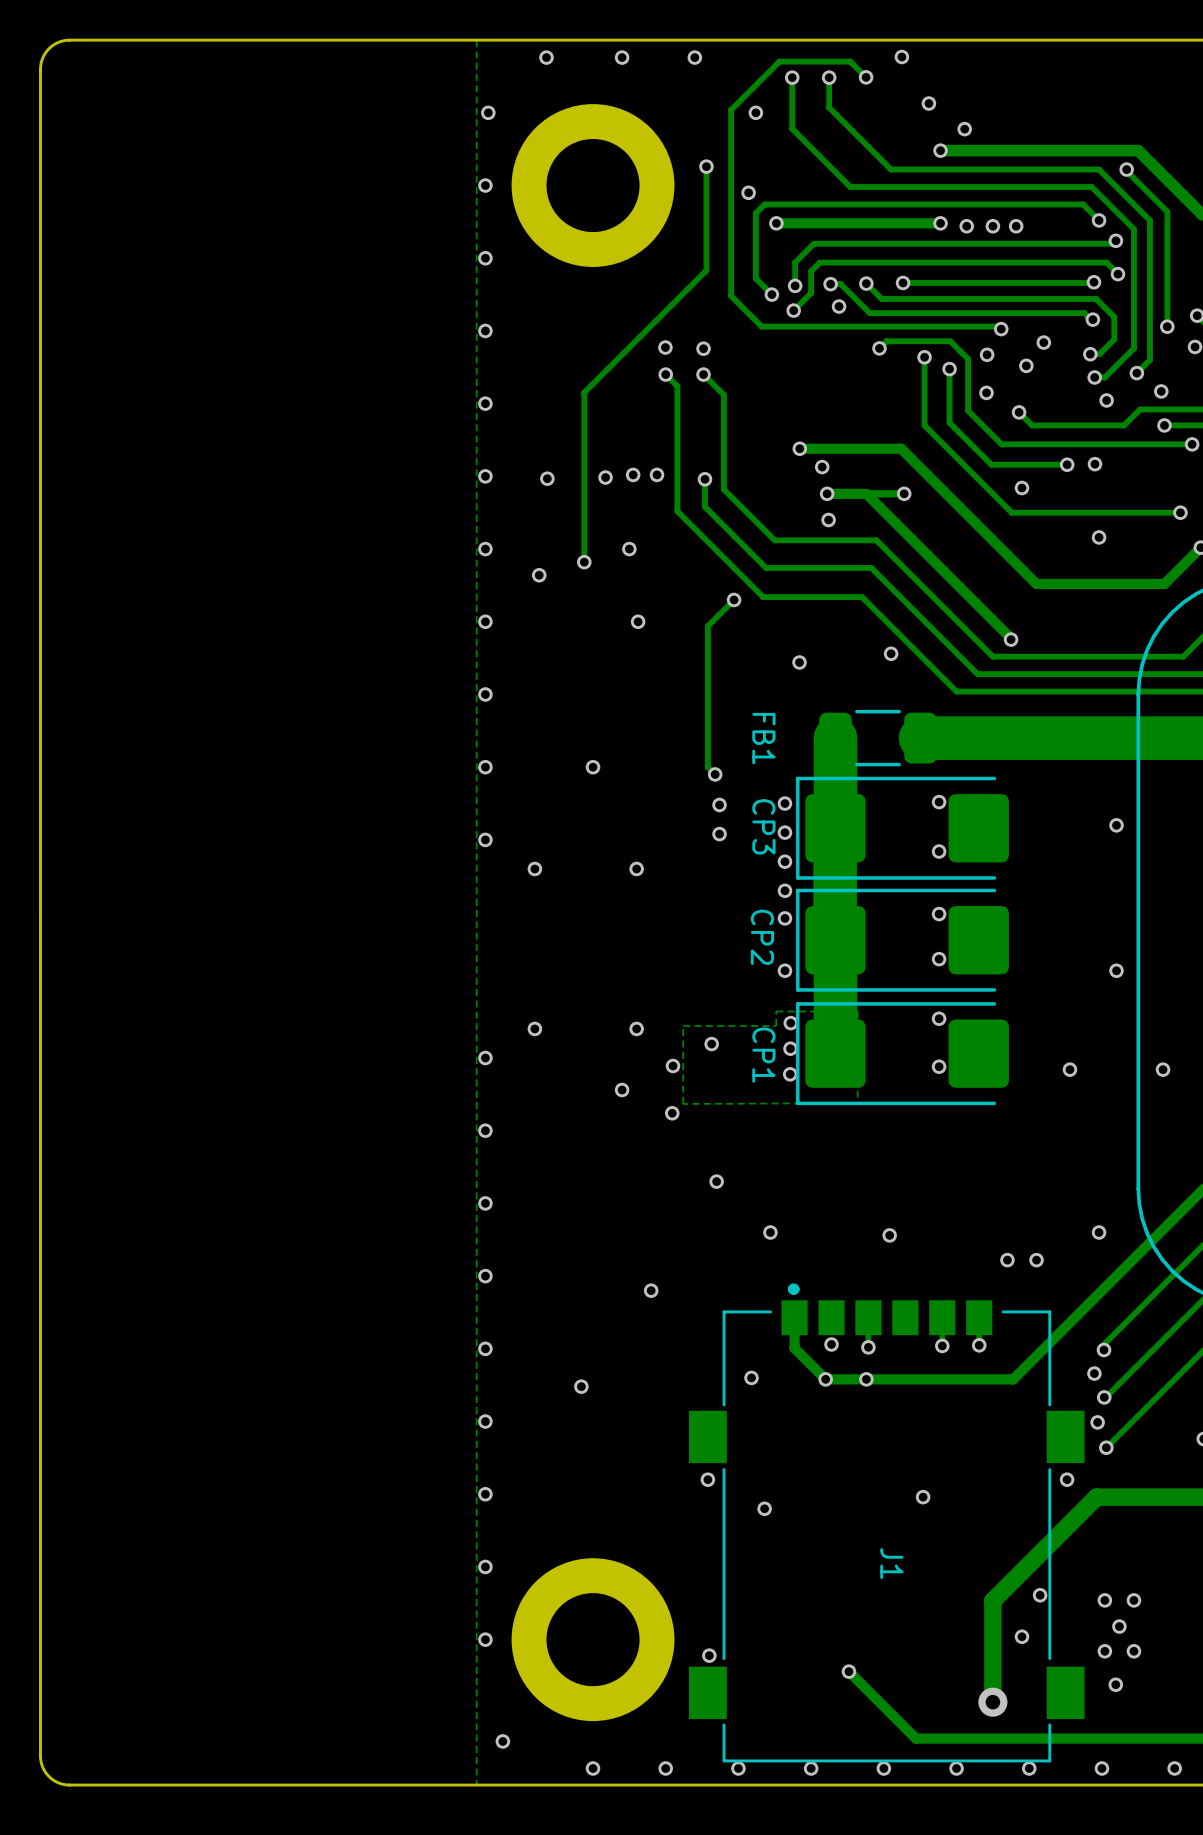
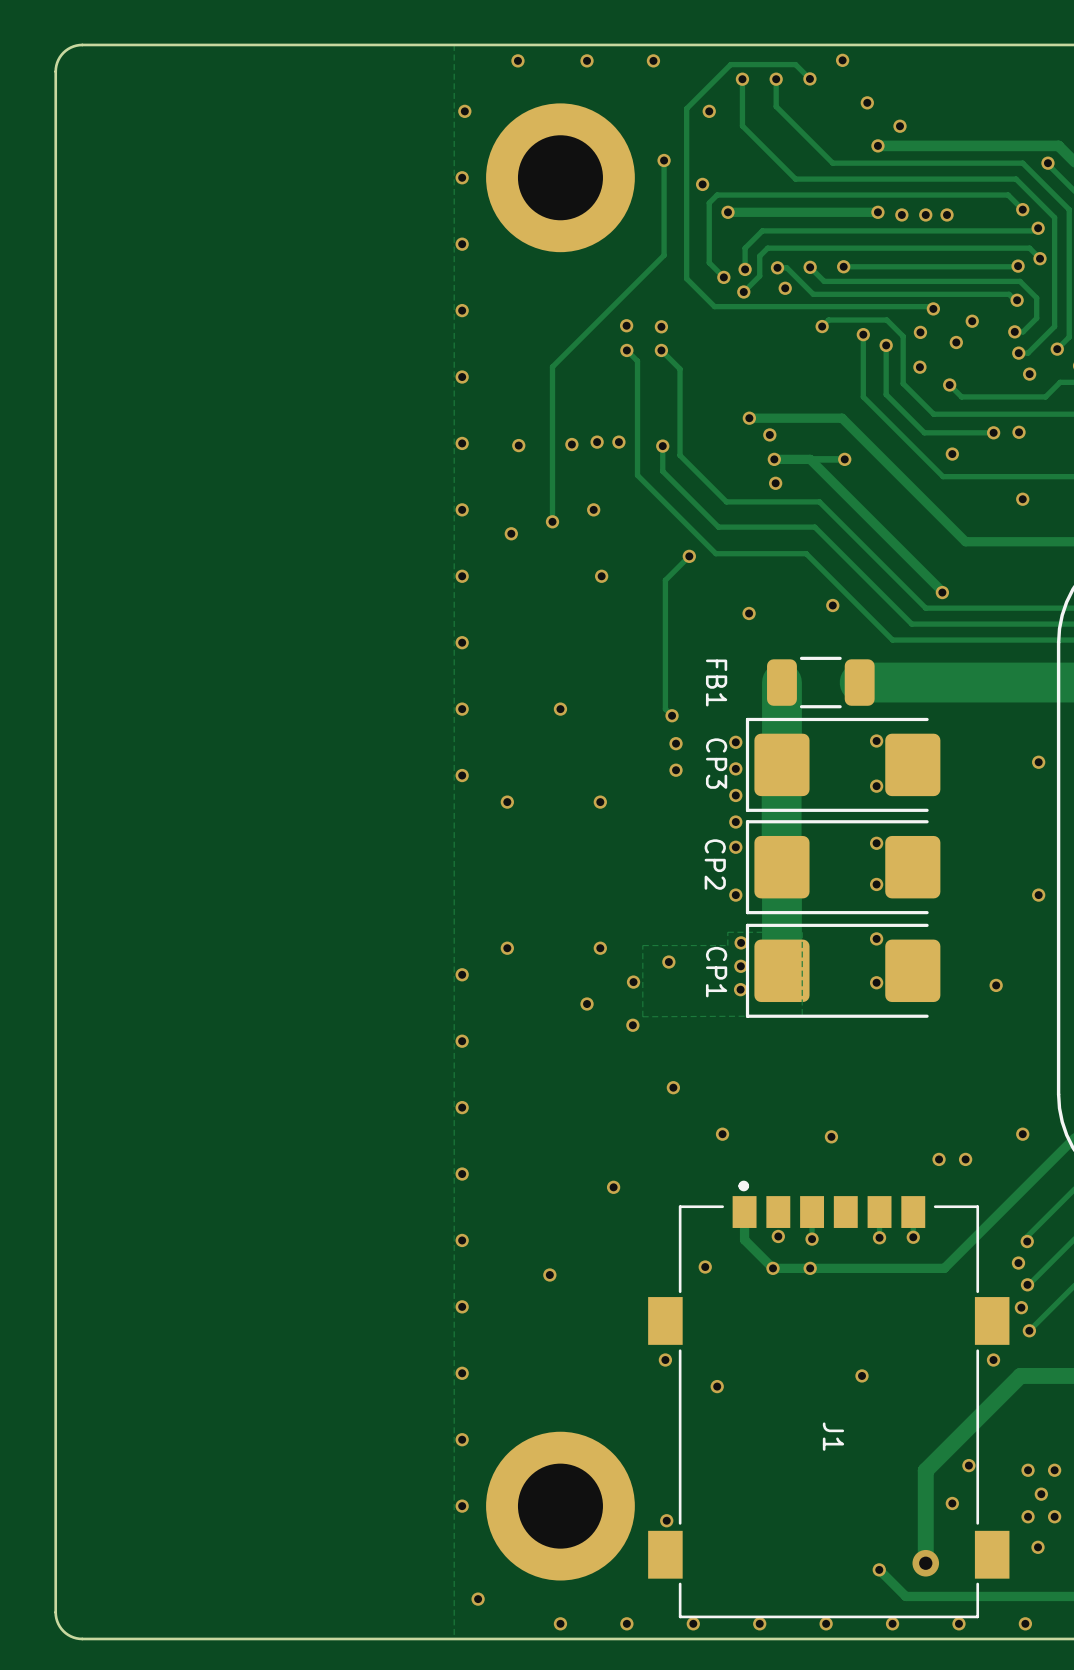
track: (848, 1671) (915, 1738) (971, 1738) -> (879, 1569) (905, 1596)
via position: (848, 1671) -> (879, 1569)

